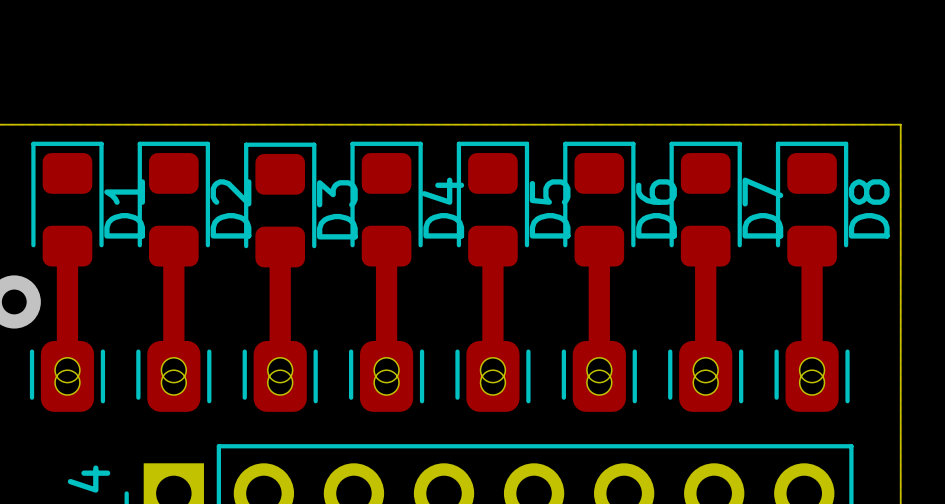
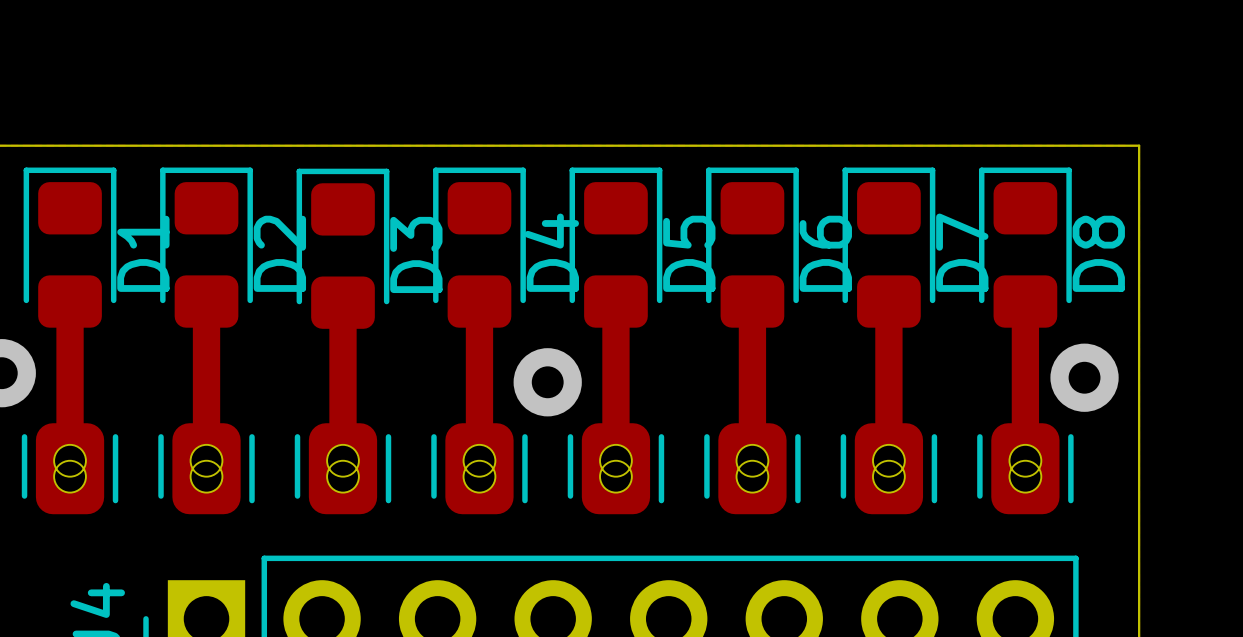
via: none -> (1084, 377)
via: none -> (547, 382)

